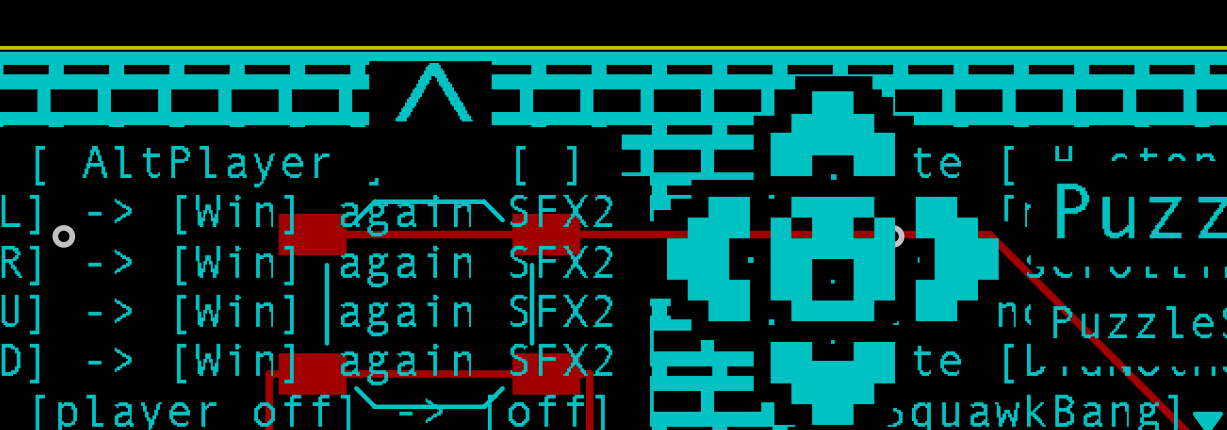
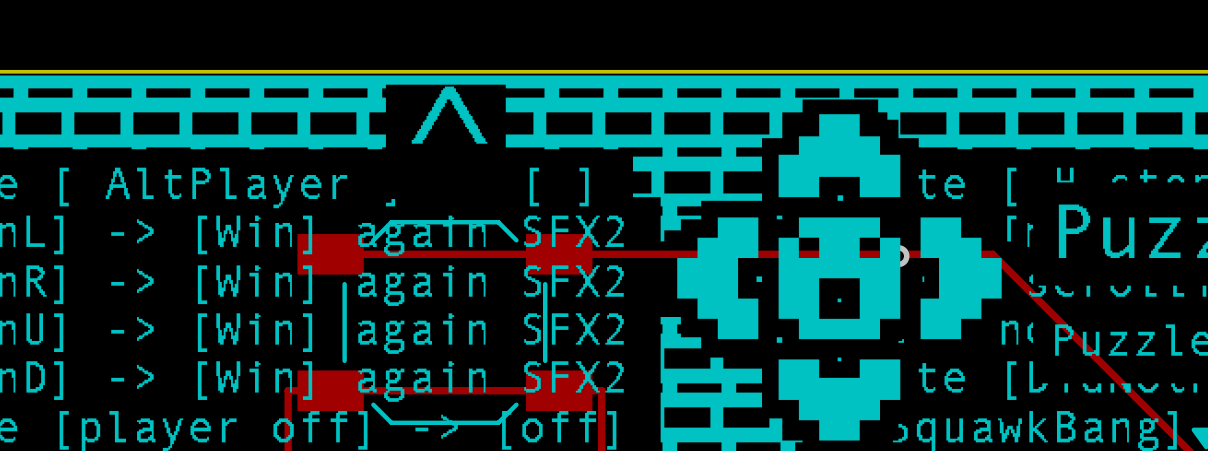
via: (63, 236) -> none

